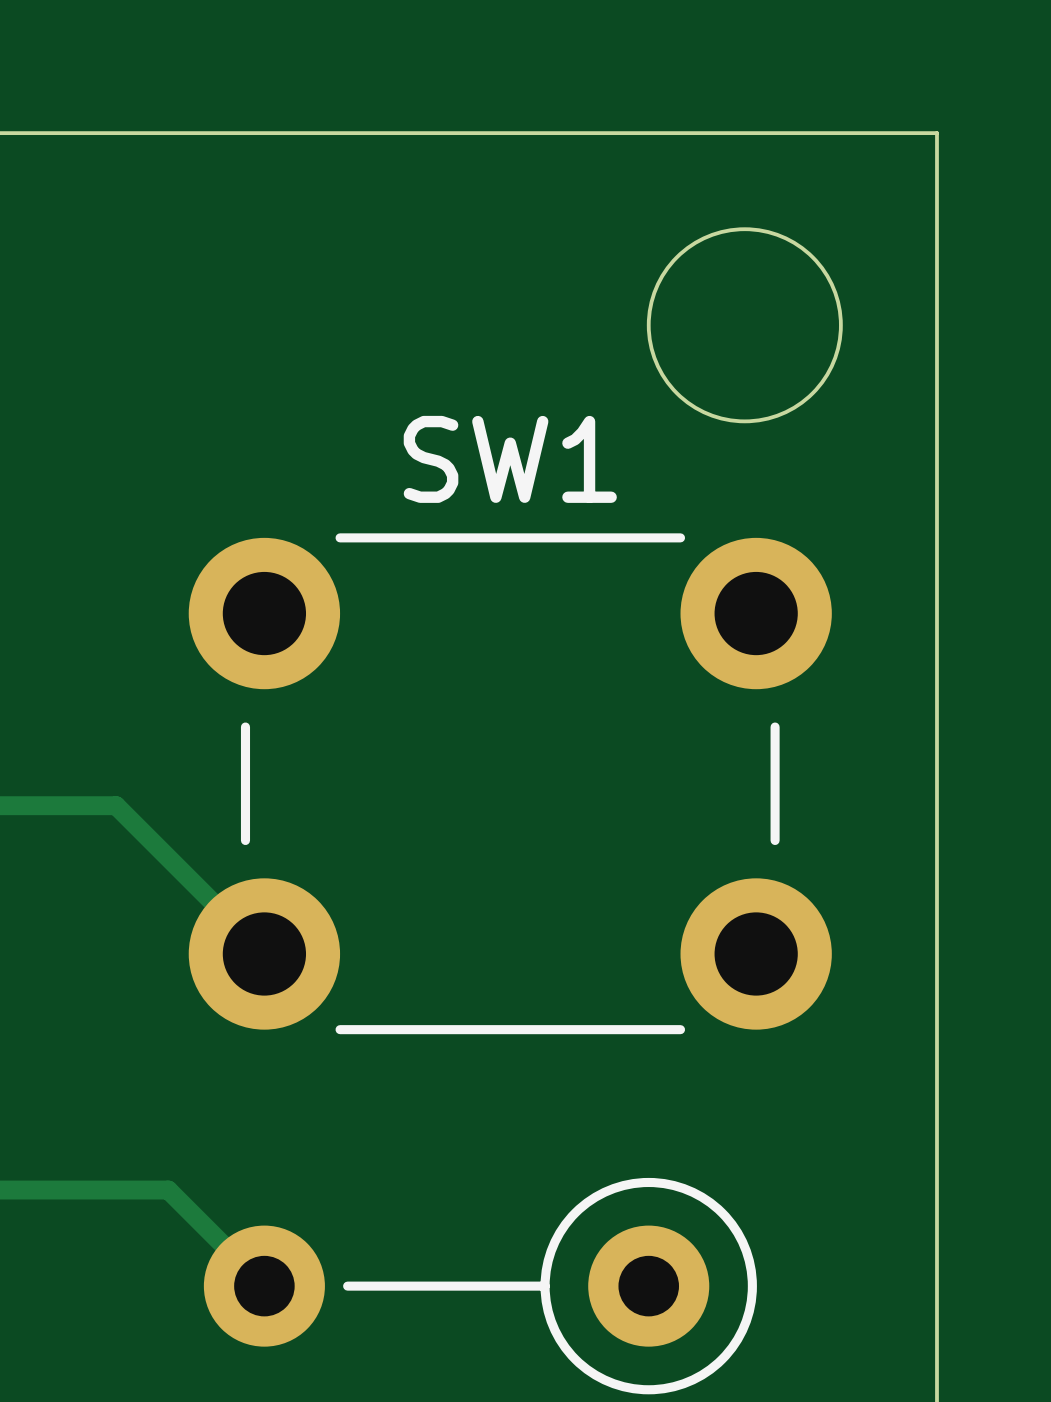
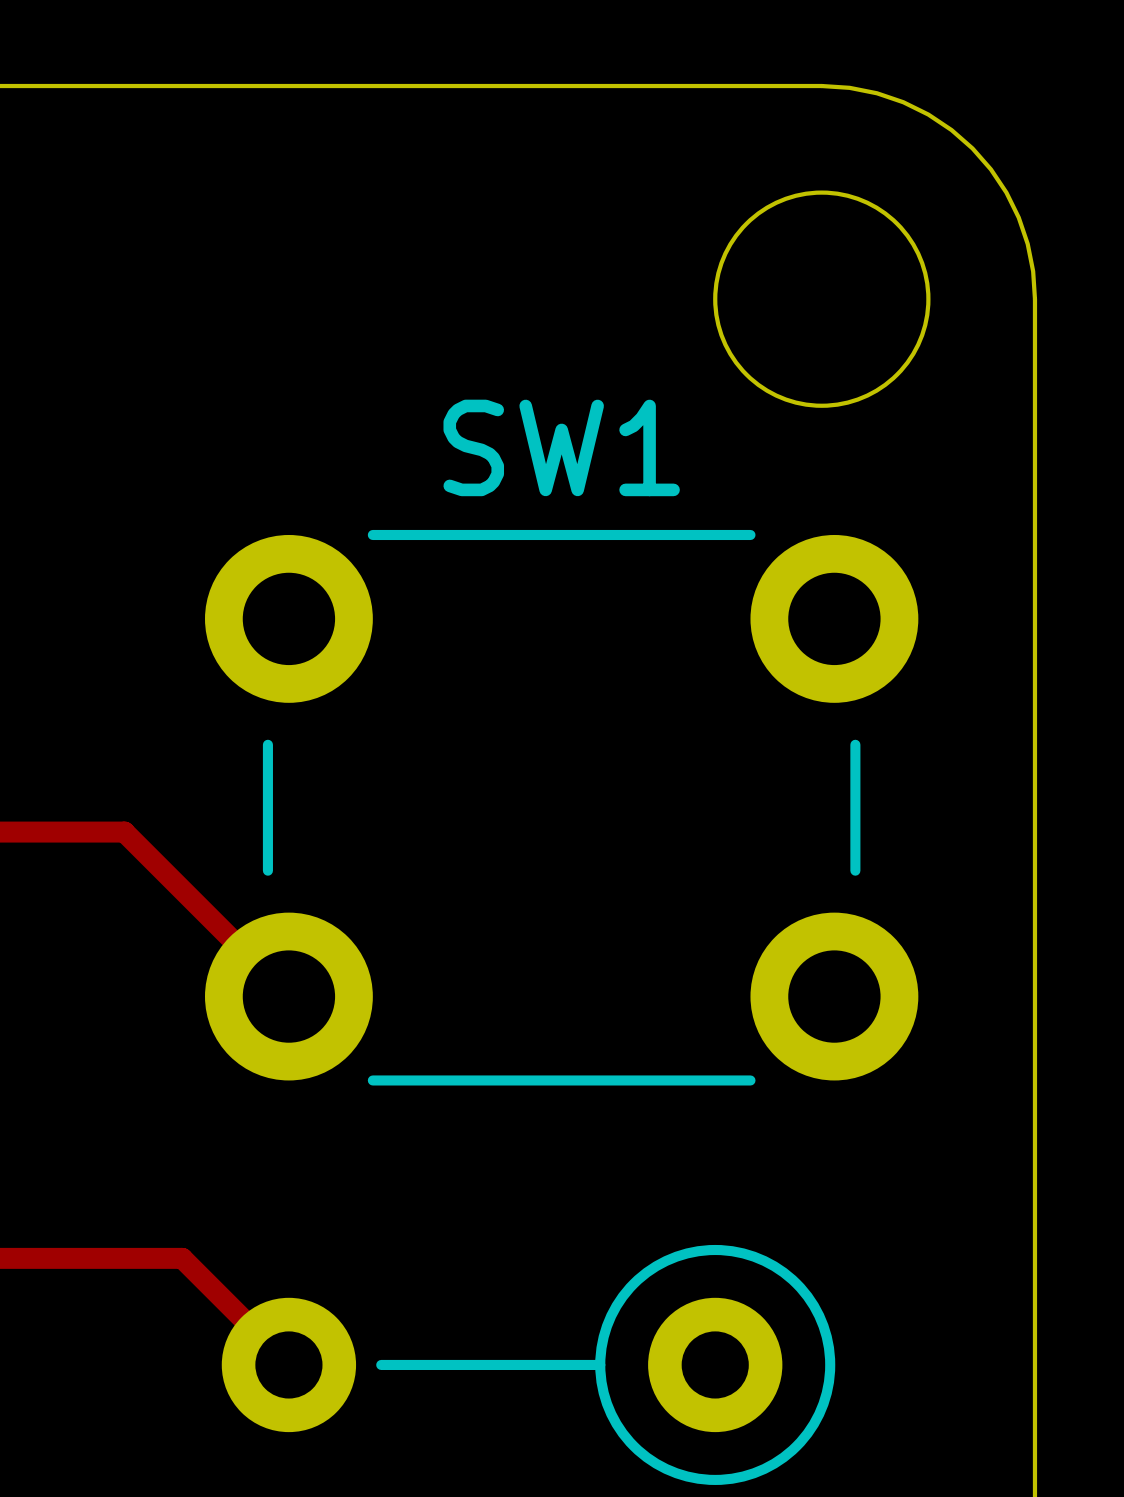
board edge: (744, 133) (936, 133) (936, 325) -> (821, 86) (849, 87) (876, 93) (903, 102) (928, 114) (951, 130) (972, 148) (990, 169) (1006, 192) (1018, 217) (1027, 244) (1033, 271) (1034, 299)

